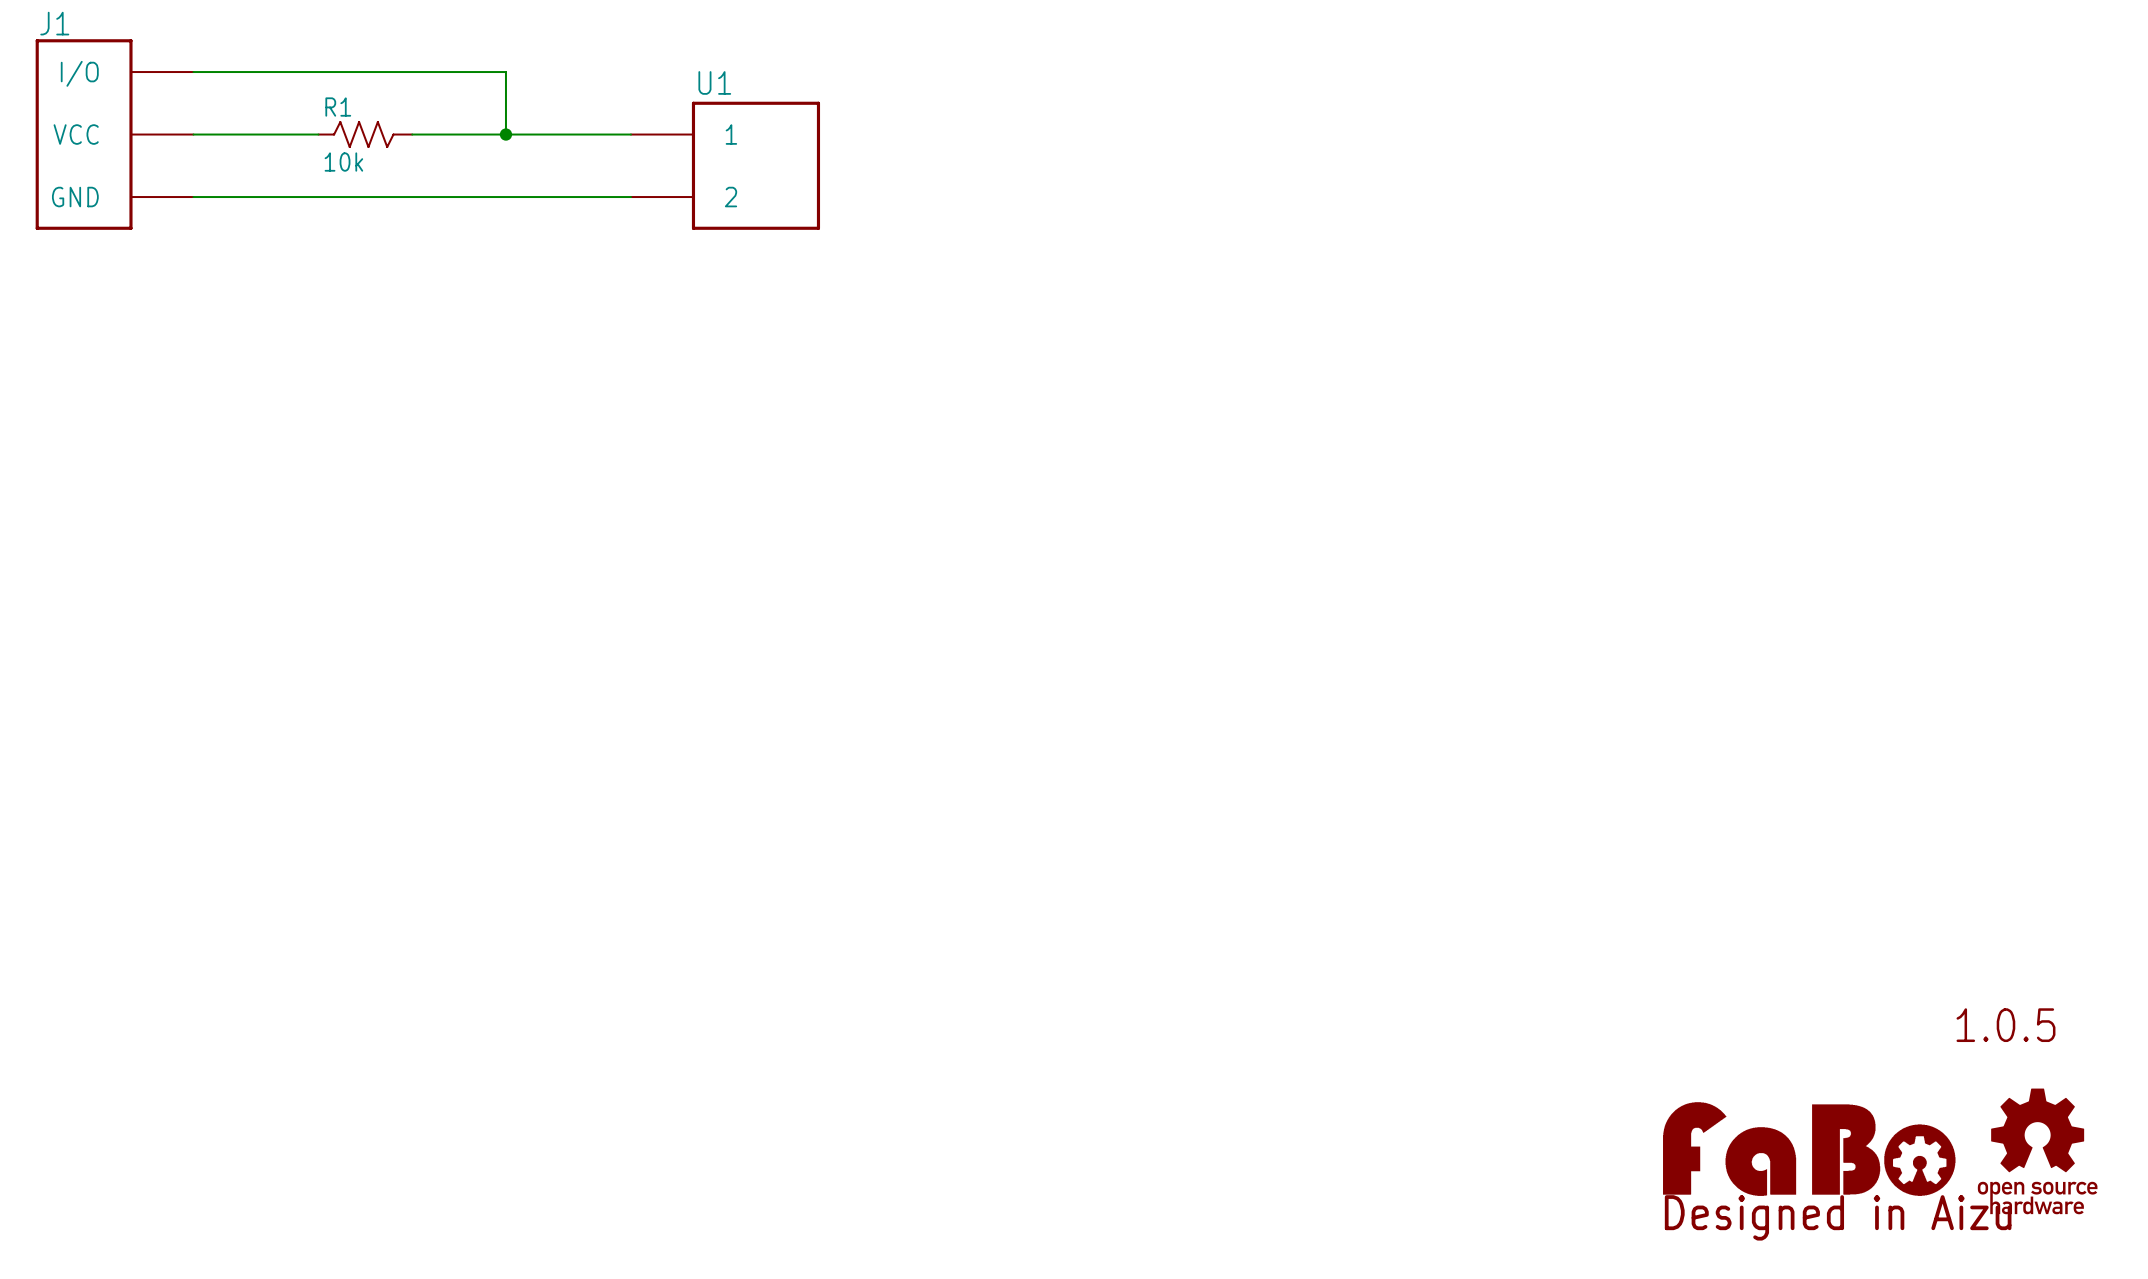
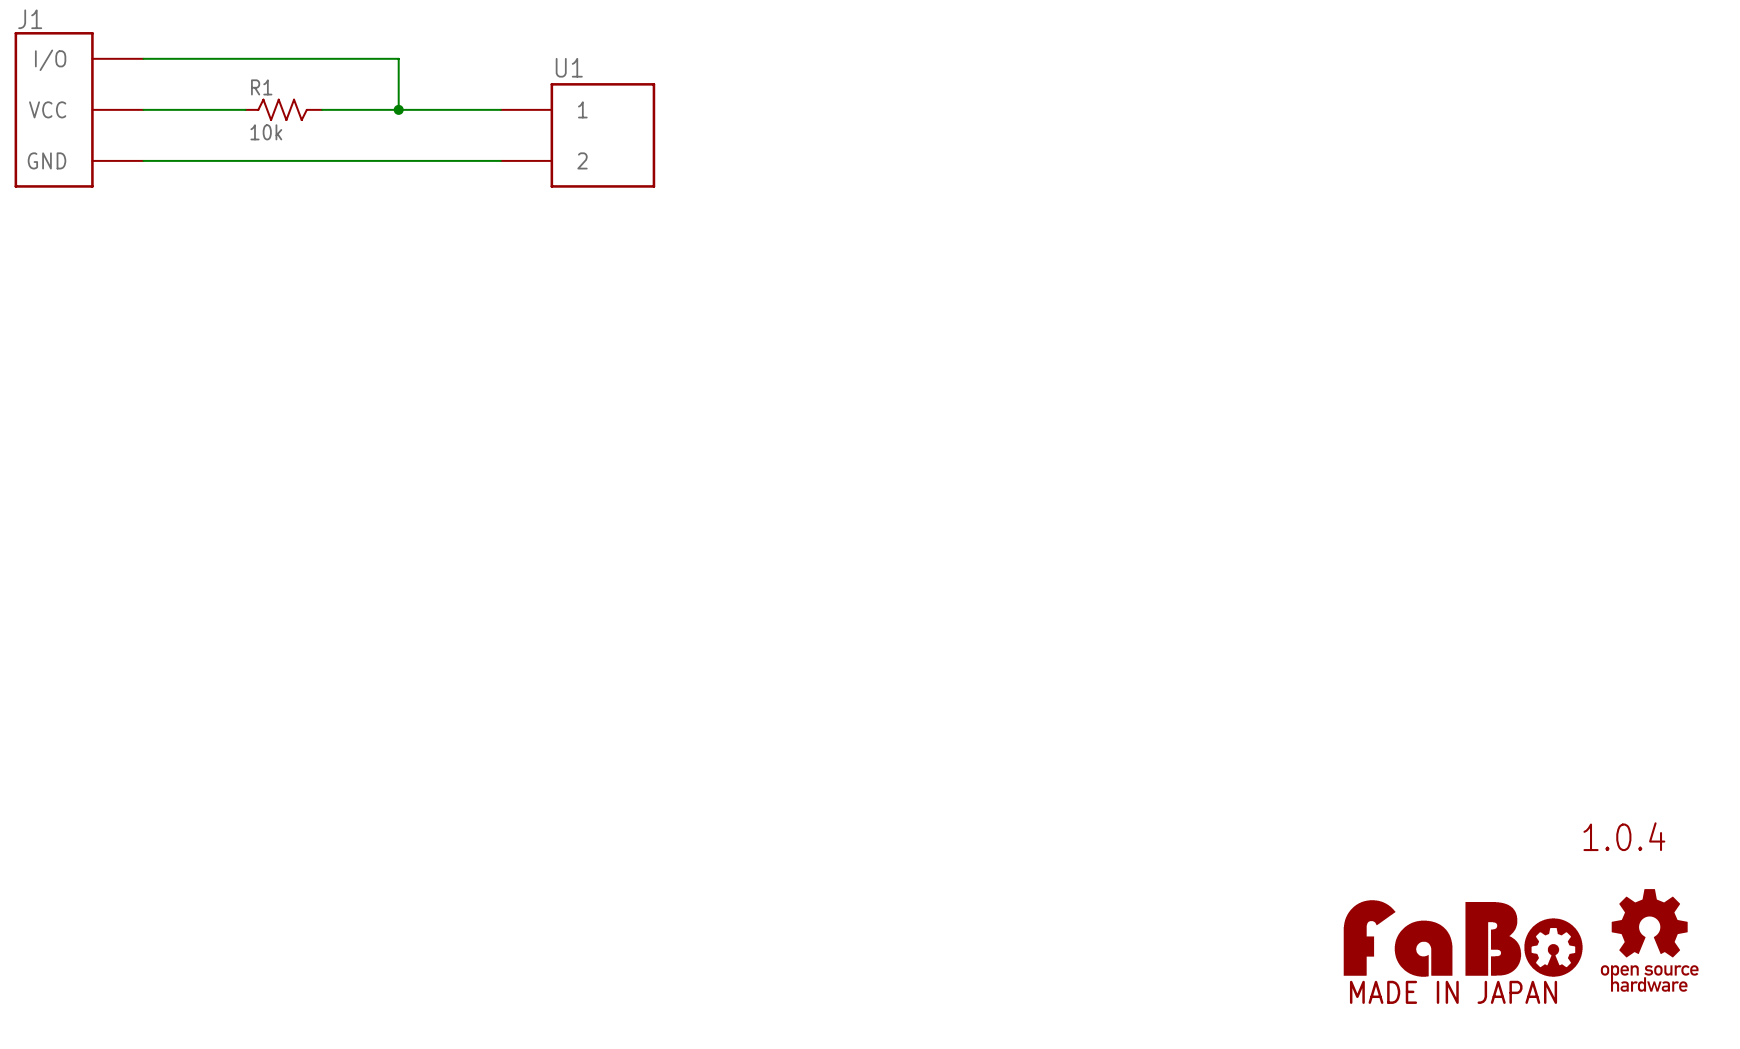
text: 1.0.5 (2005, 1025) -> 1.0.4 (1624, 836)
part text: none -> MADE IN JAPAN (1453, 992)
part text: Designed in Aizu (1838, 1217) -> none

